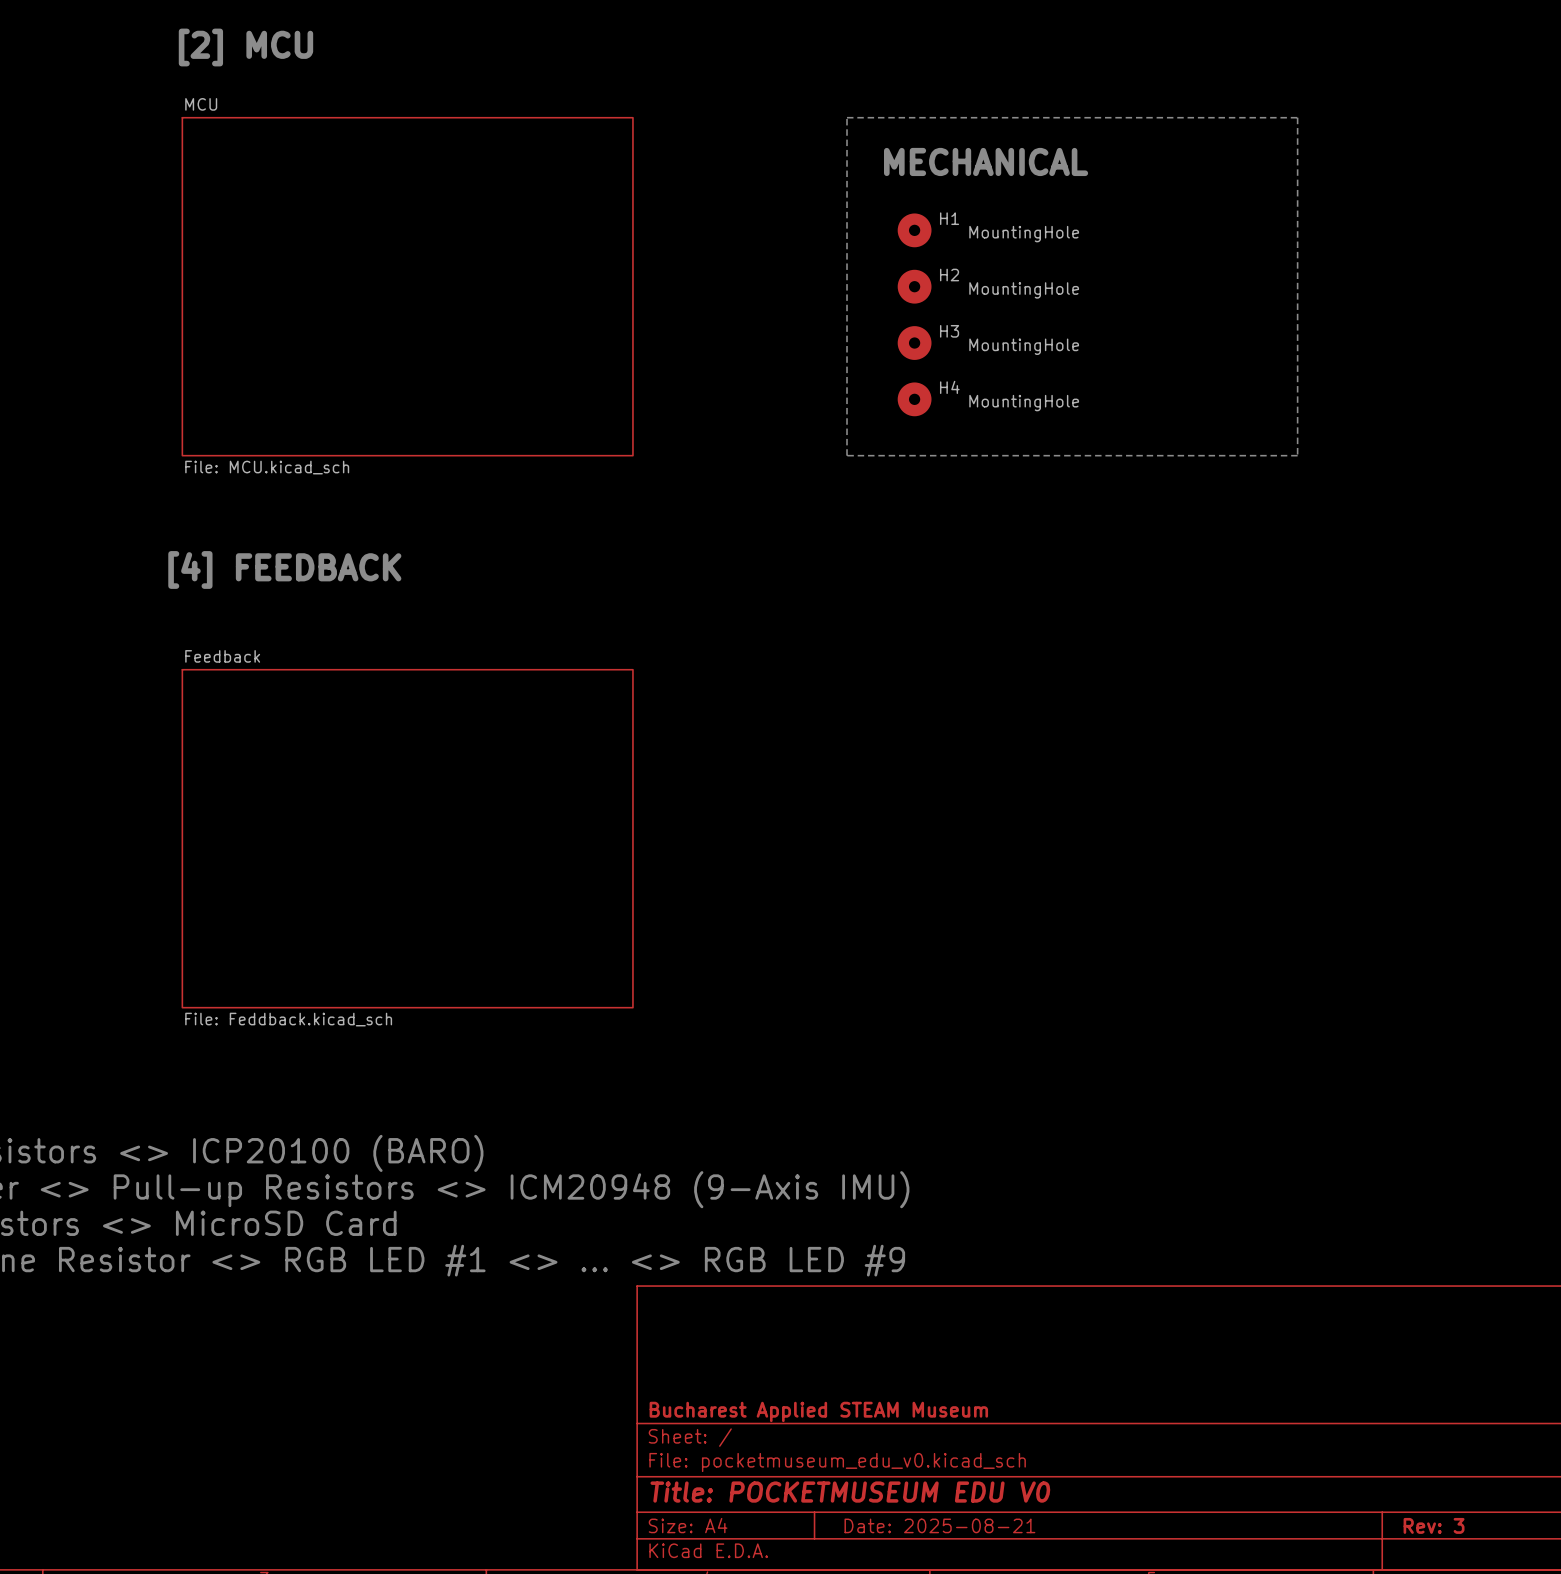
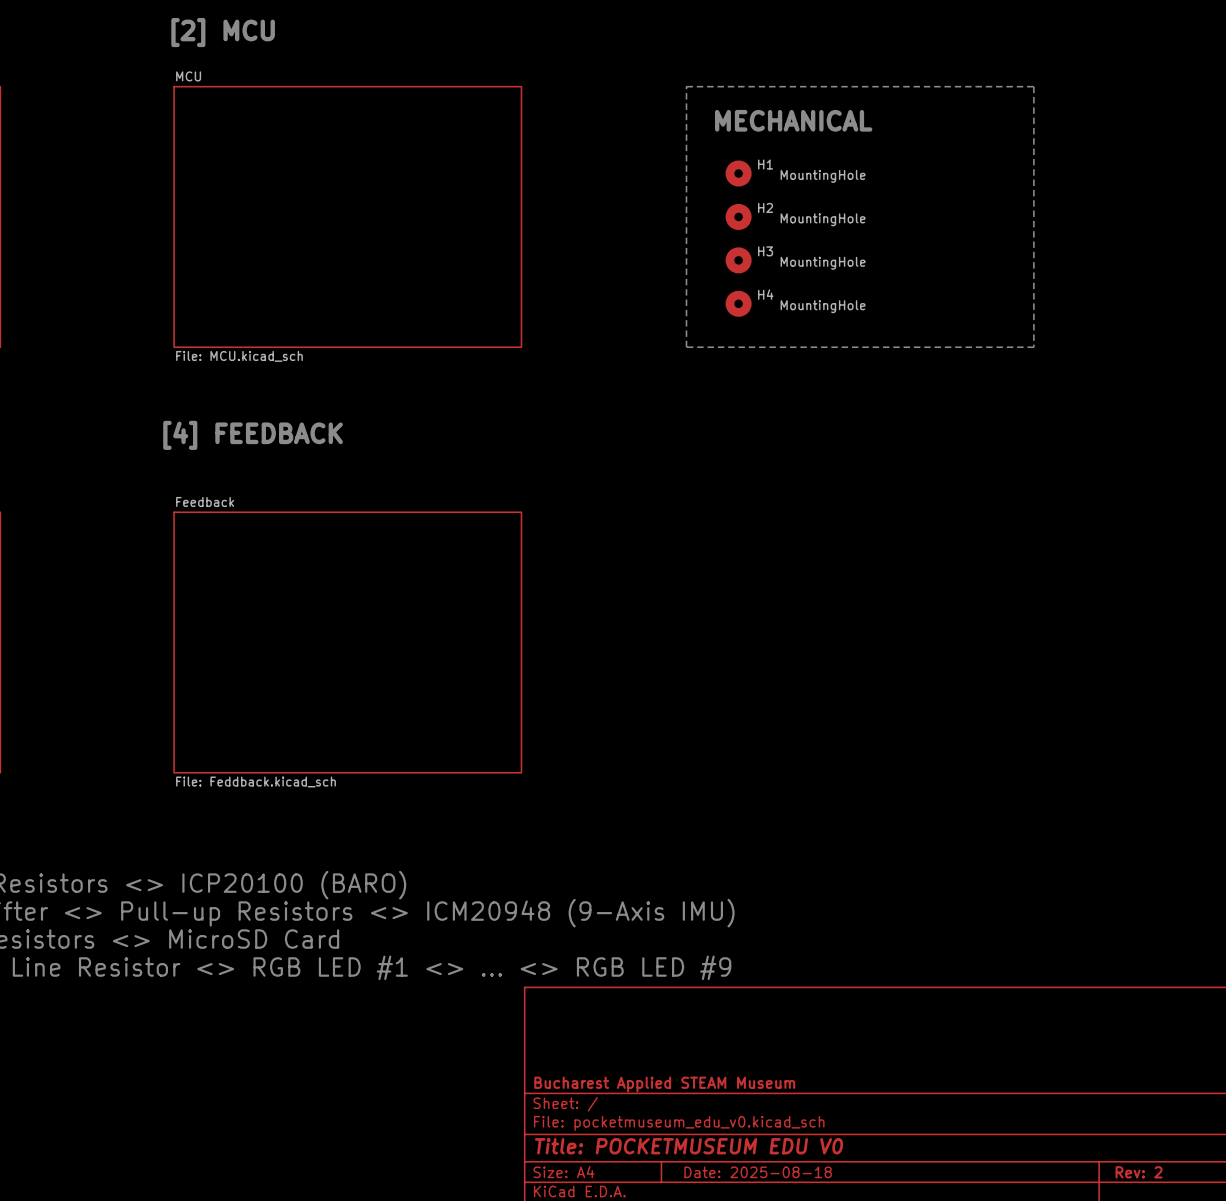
title block: Date: 2025-08-21 (939, 1525) -> Date: 2025-08-18 (758, 1172)
title block: Rev: 3 (1434, 1525) -> Rev: 2 (1139, 1172)

